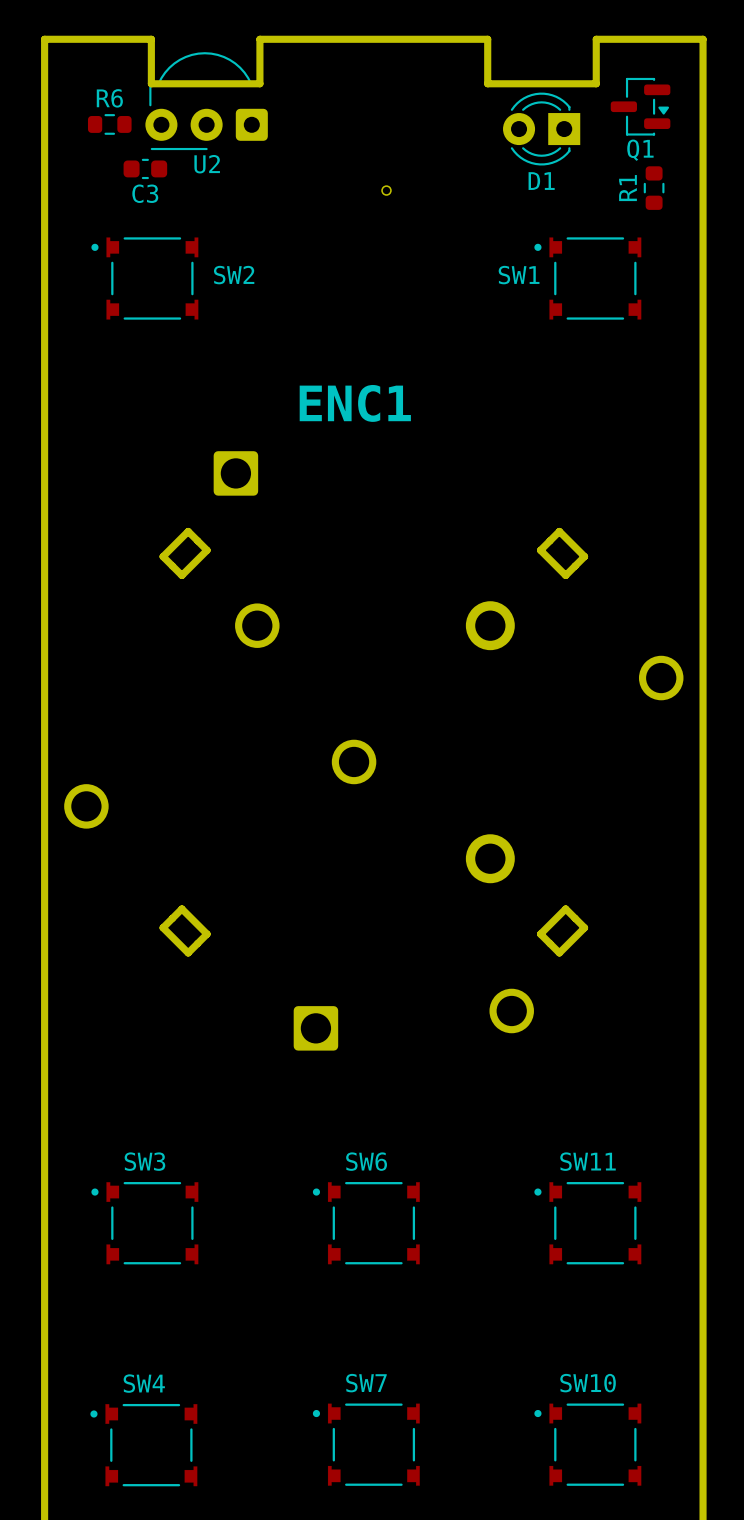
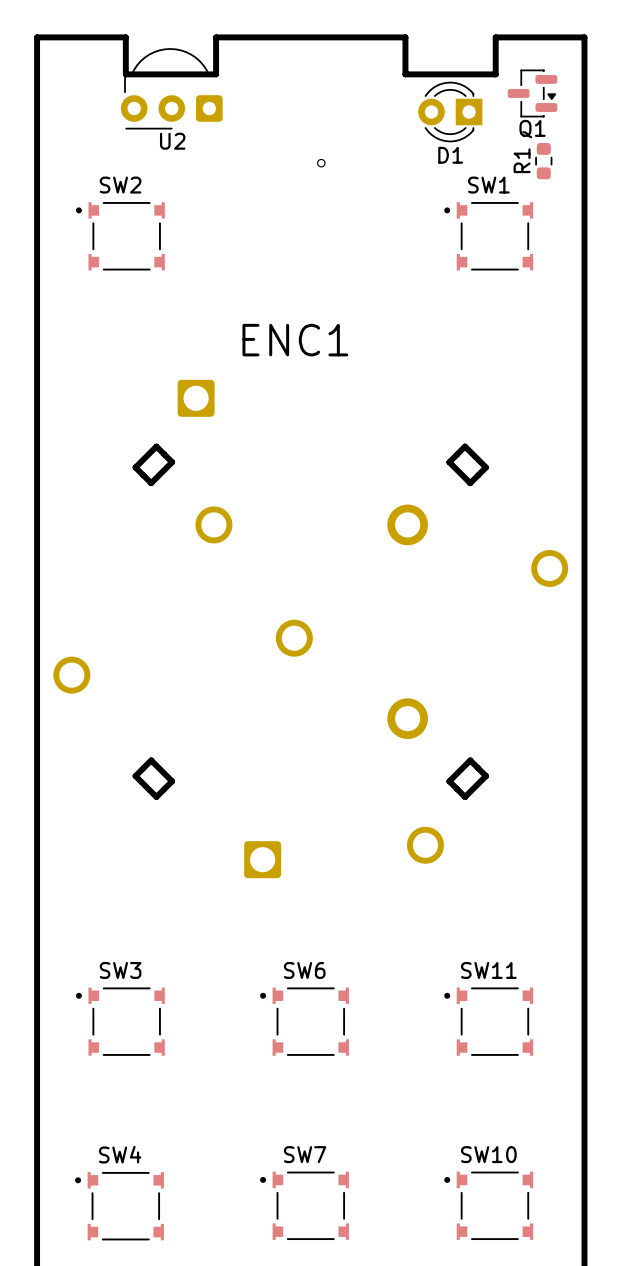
R6: (109, 124) -> none
C3: (145, 168) -> none
SW2 name position: SW2 (234, 275) -> SW2 (120, 185)
SW1 name position: SW1 (519, 275) -> SW1 (488, 185)

